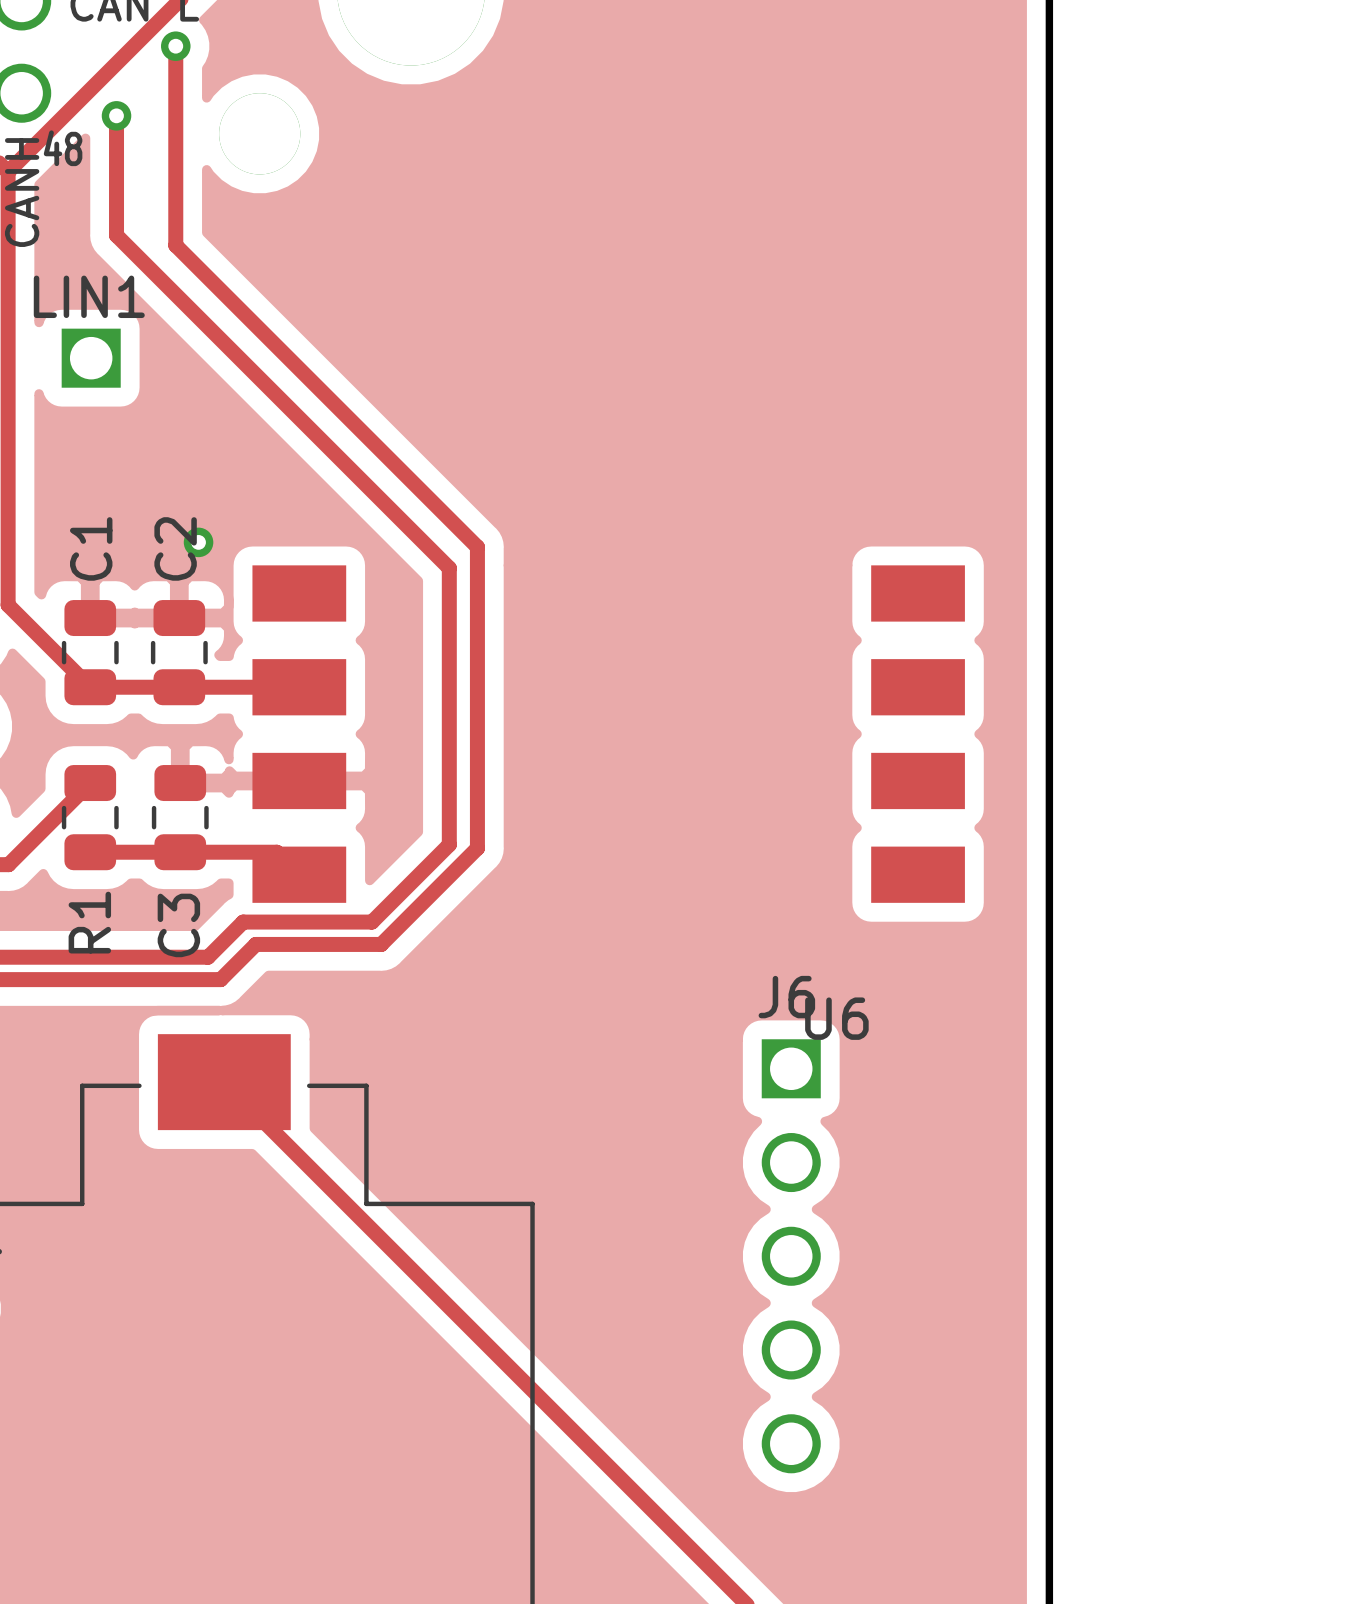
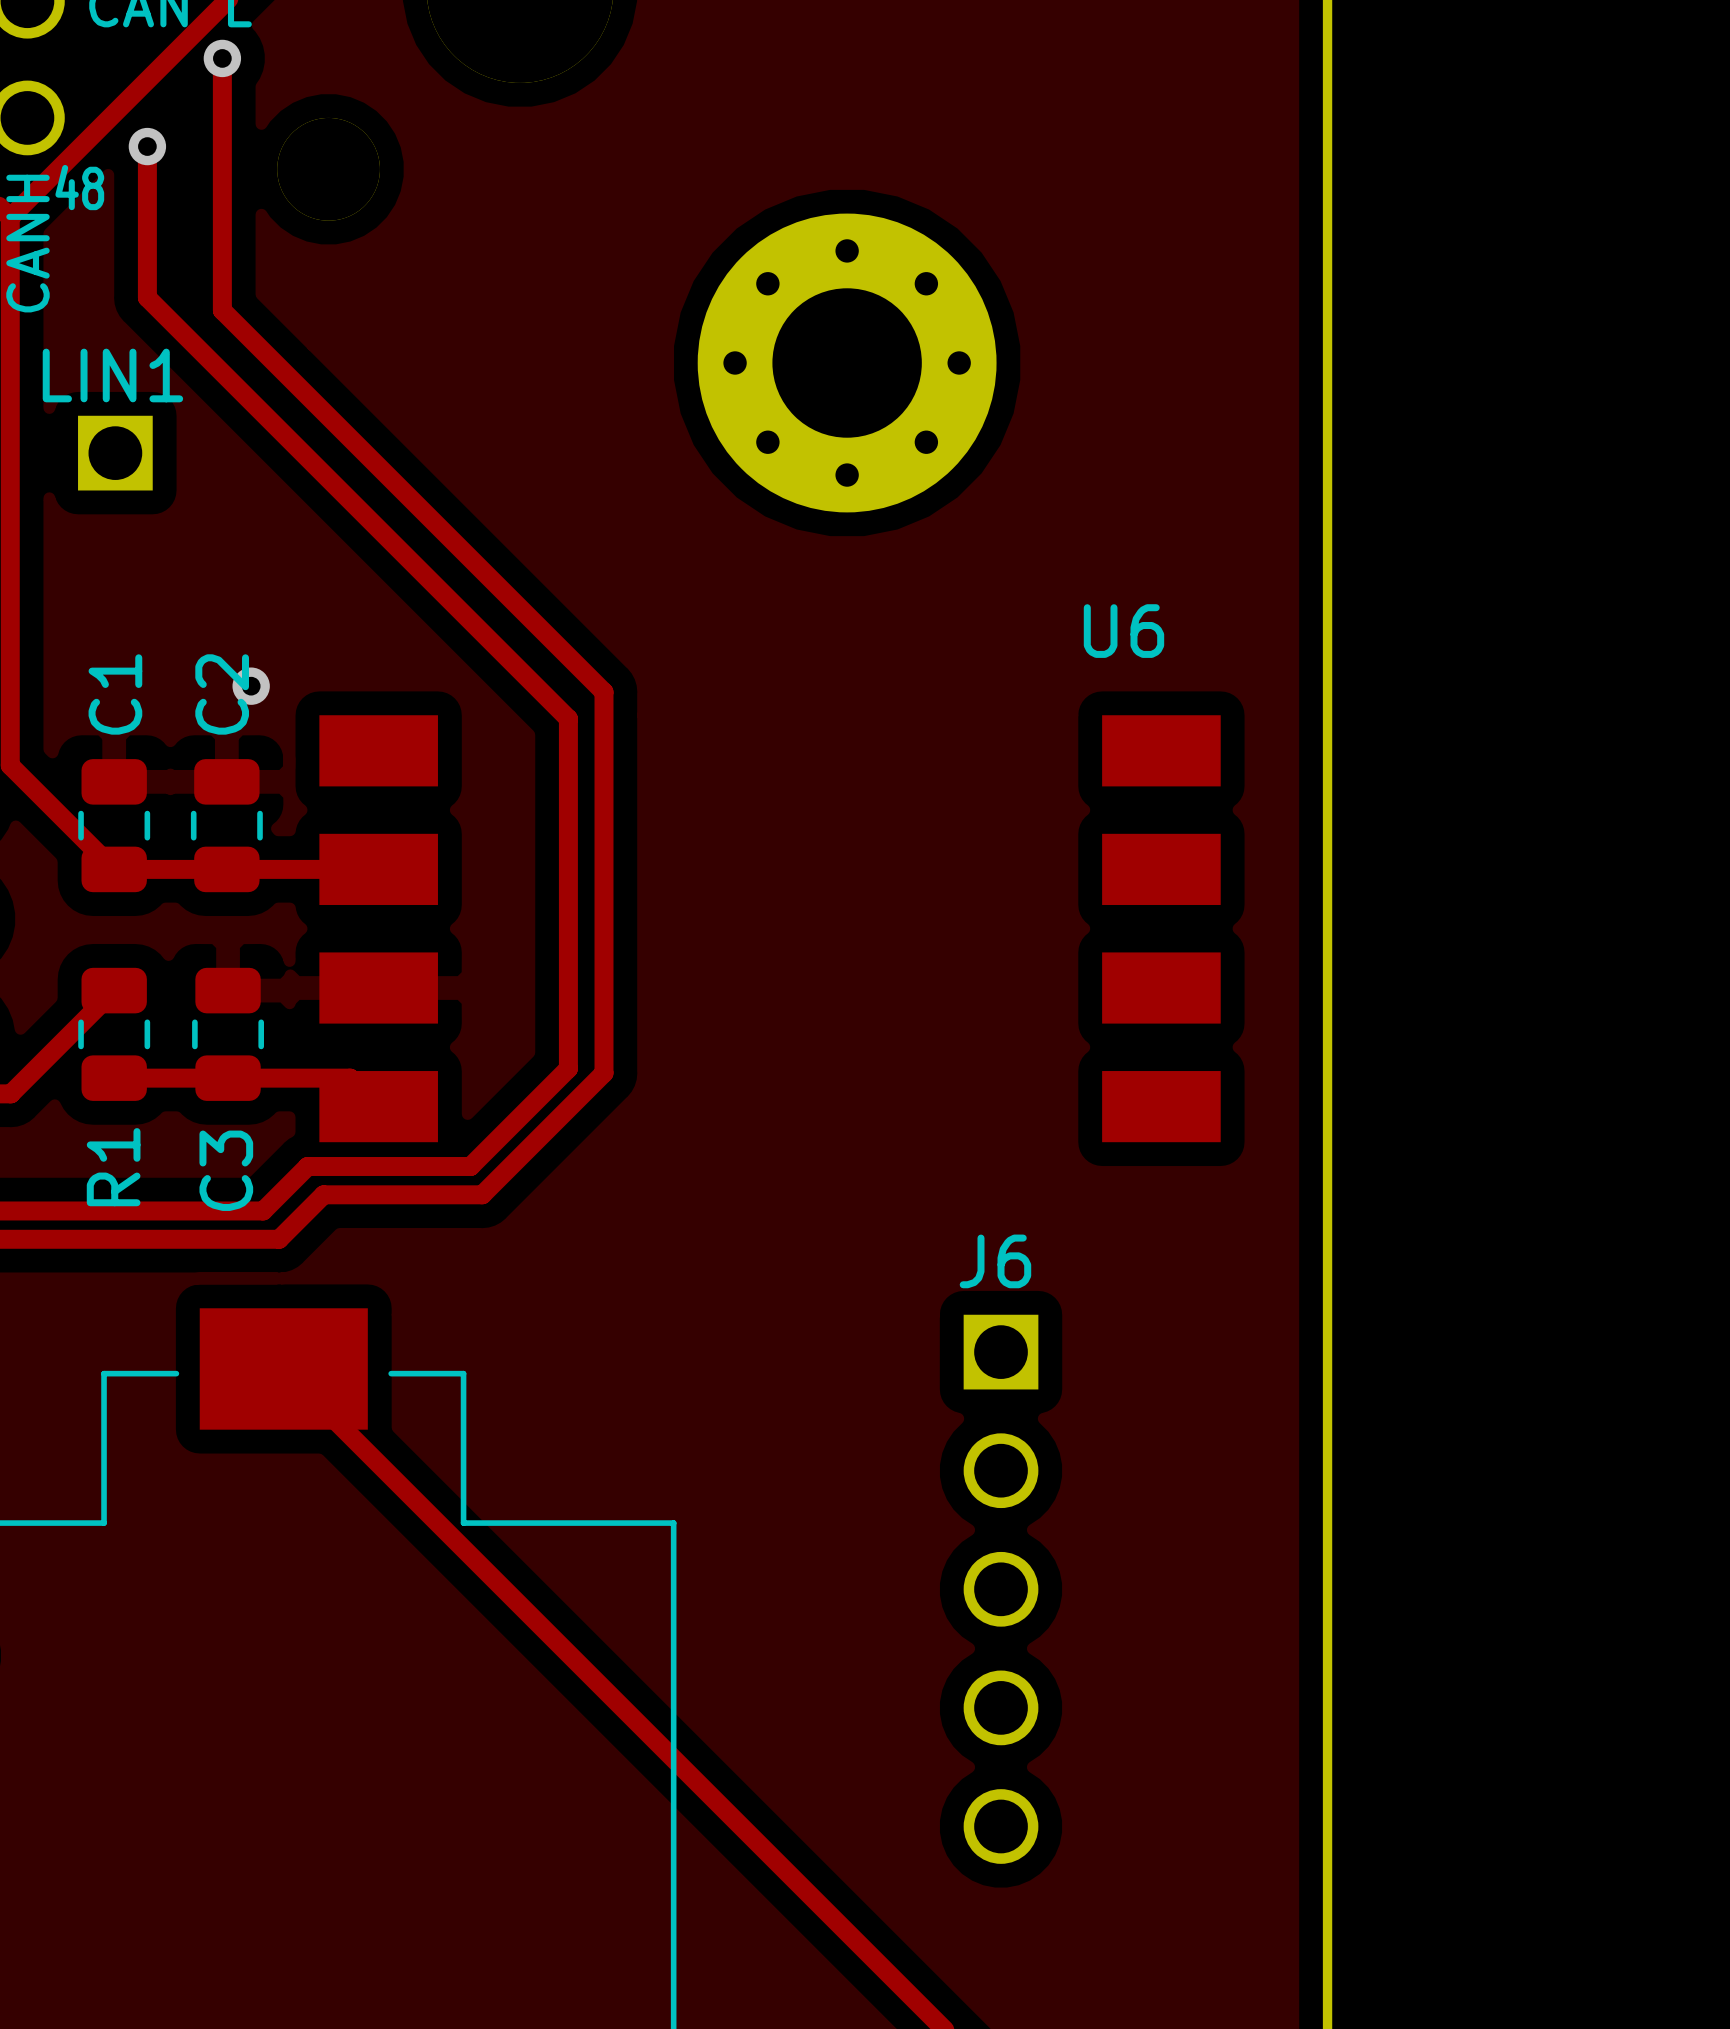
part: none -> (847, 362)
U6 footprint: [252, 565, 965, 903] -> [319, 650, 1221, 1143]
U6 name position: U6 (836, 1018) -> U6 (1123, 631)

